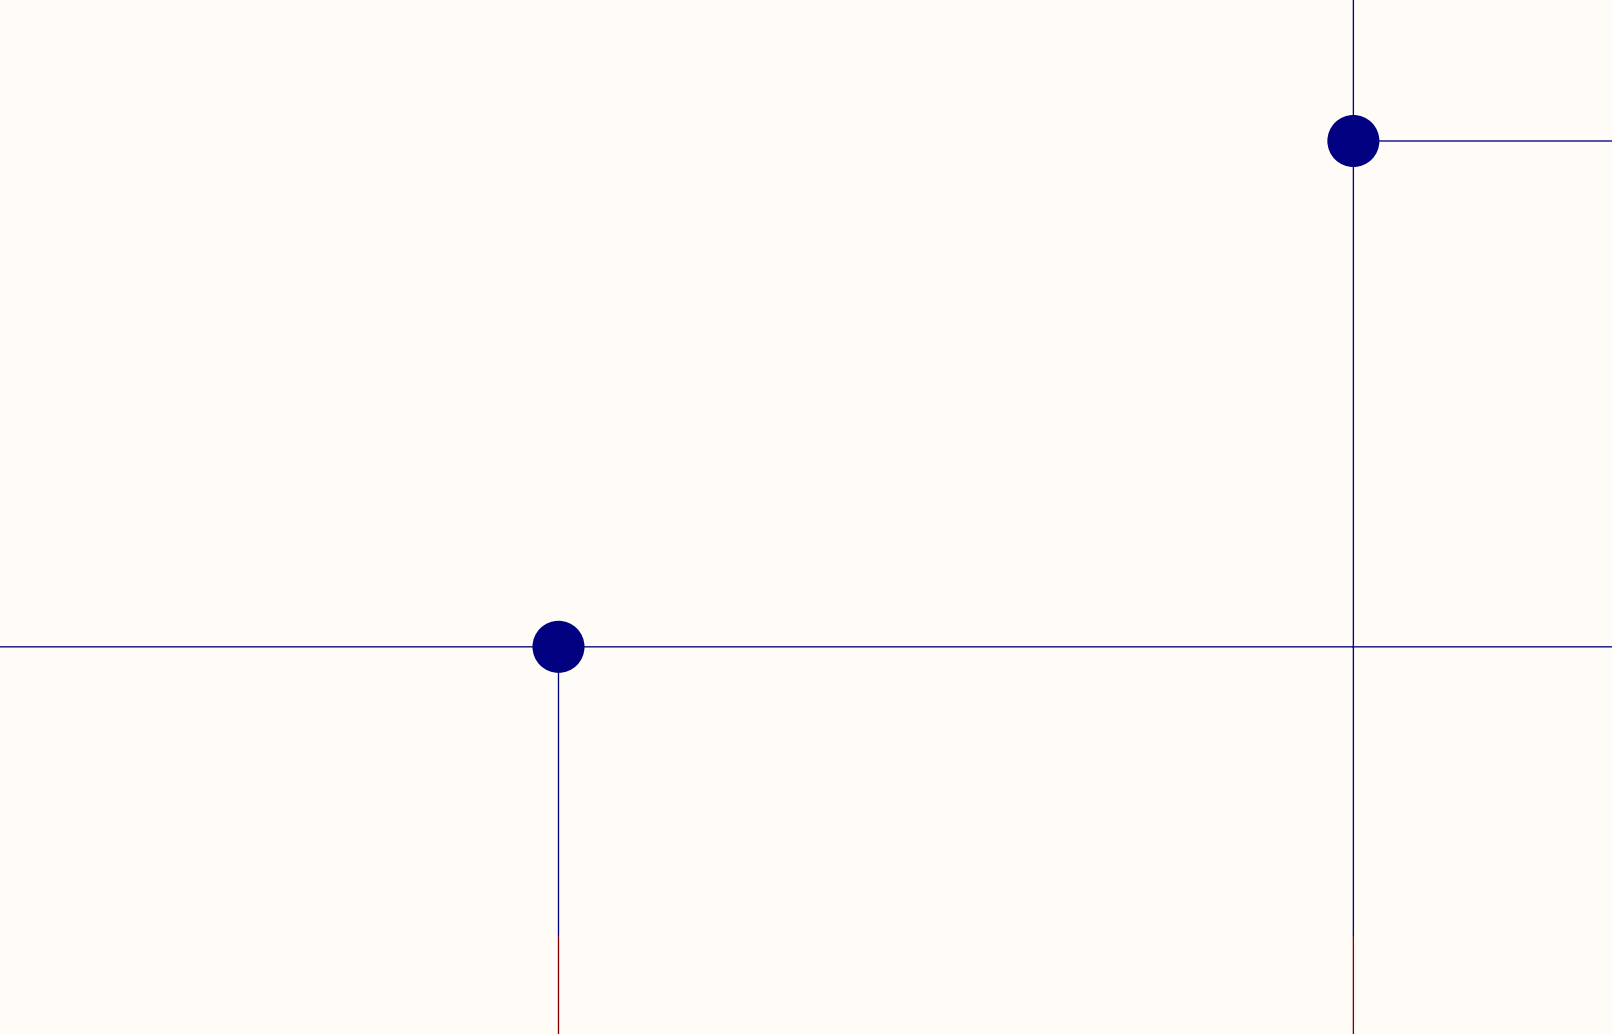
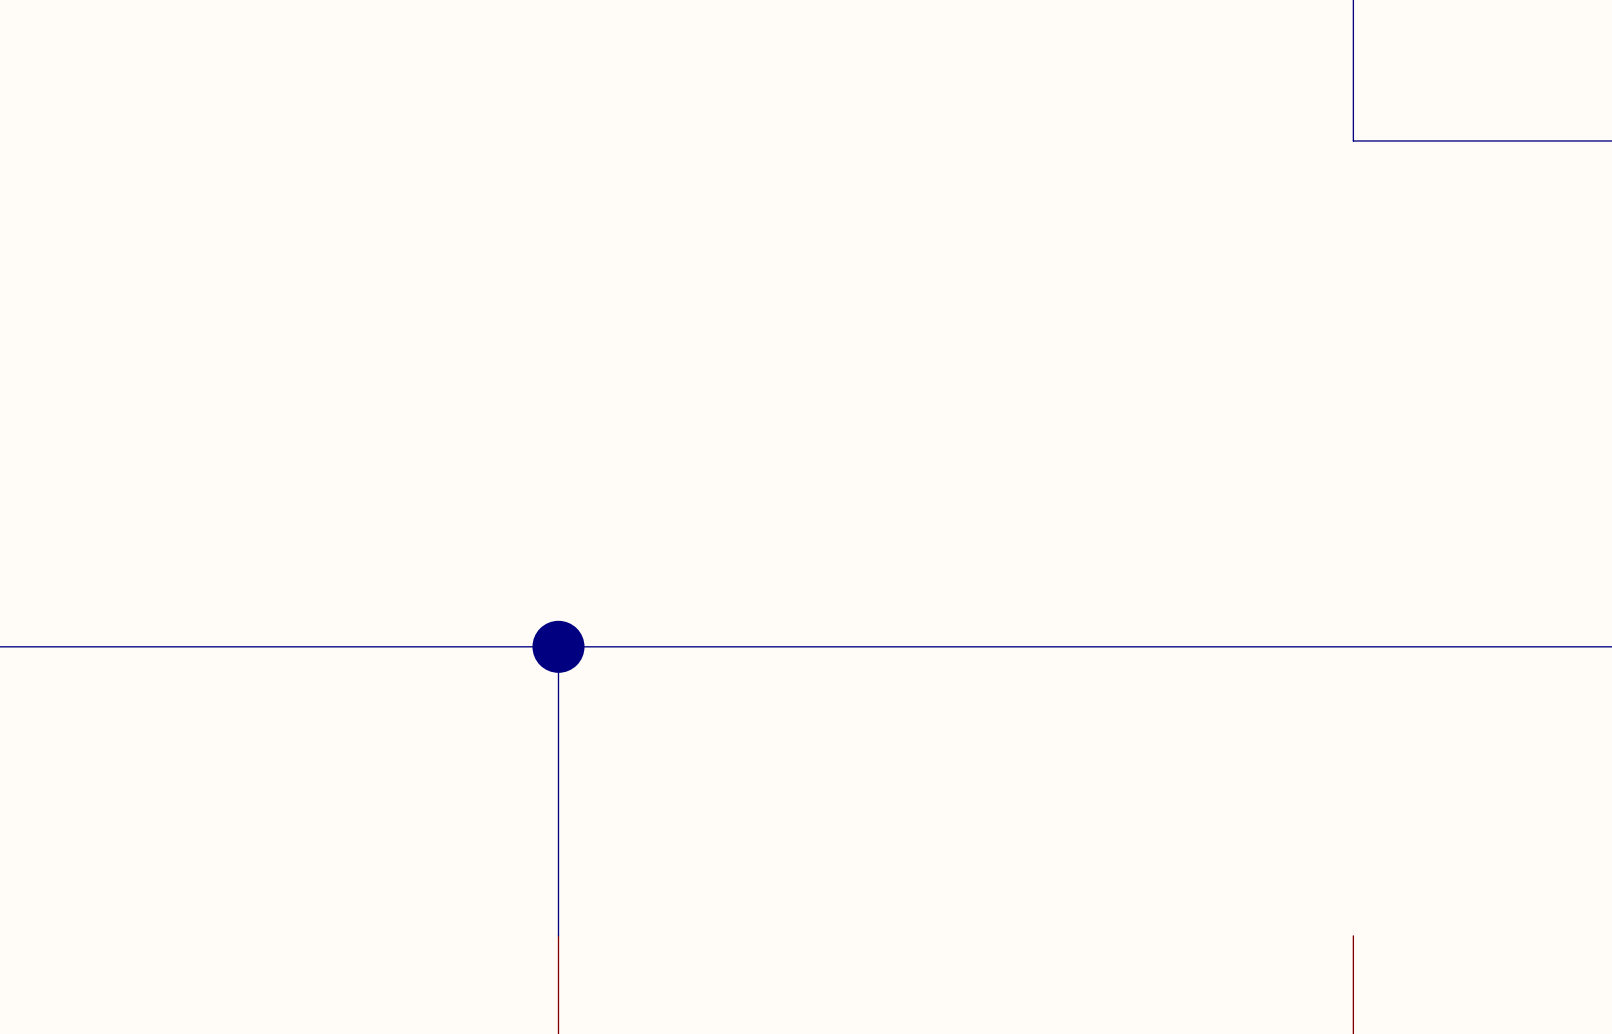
wire: (1353, 140) (1353, 935) -> none
junction: (1353, 140) -> none

